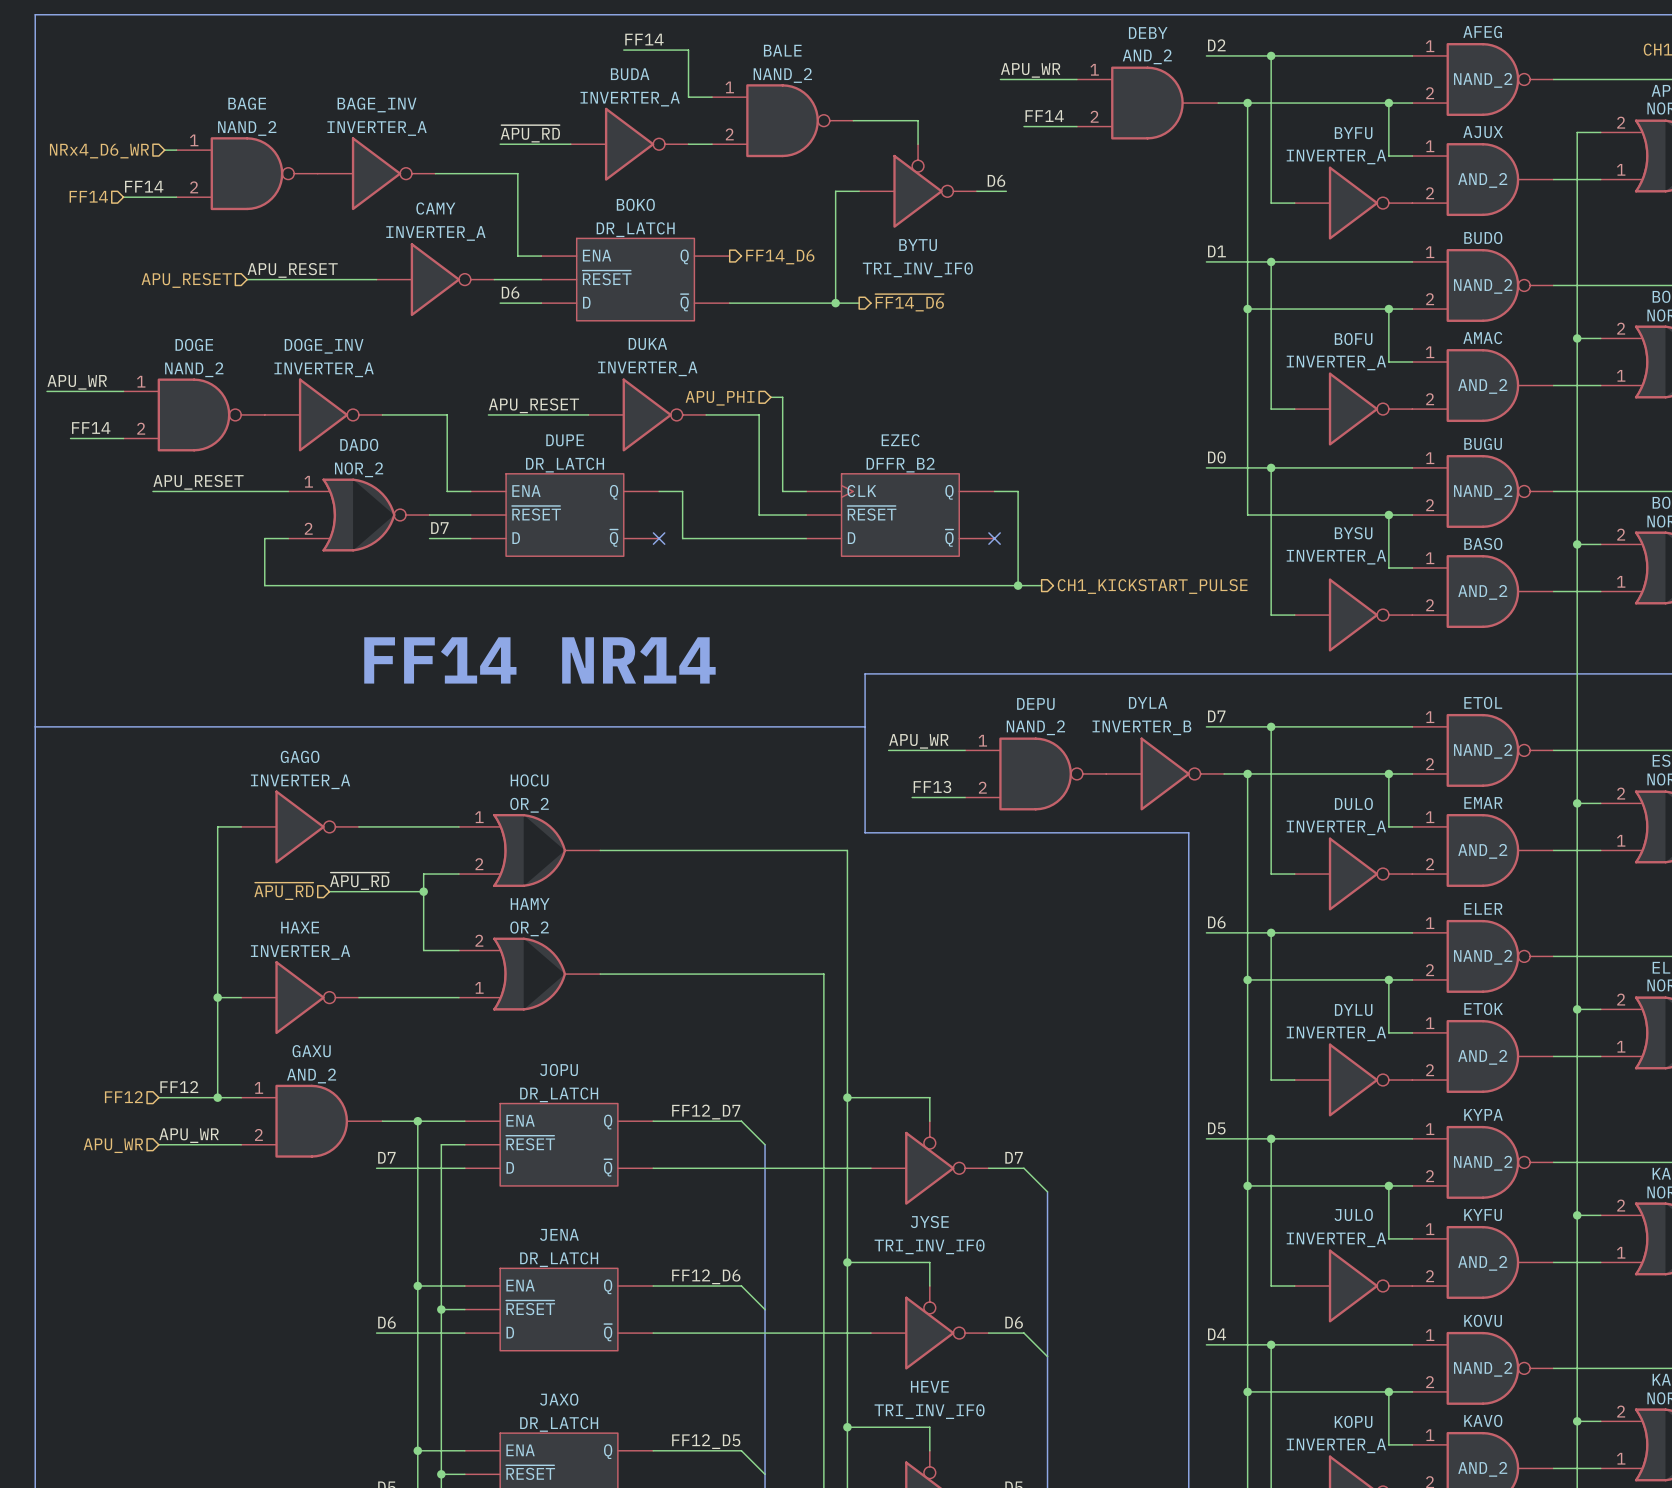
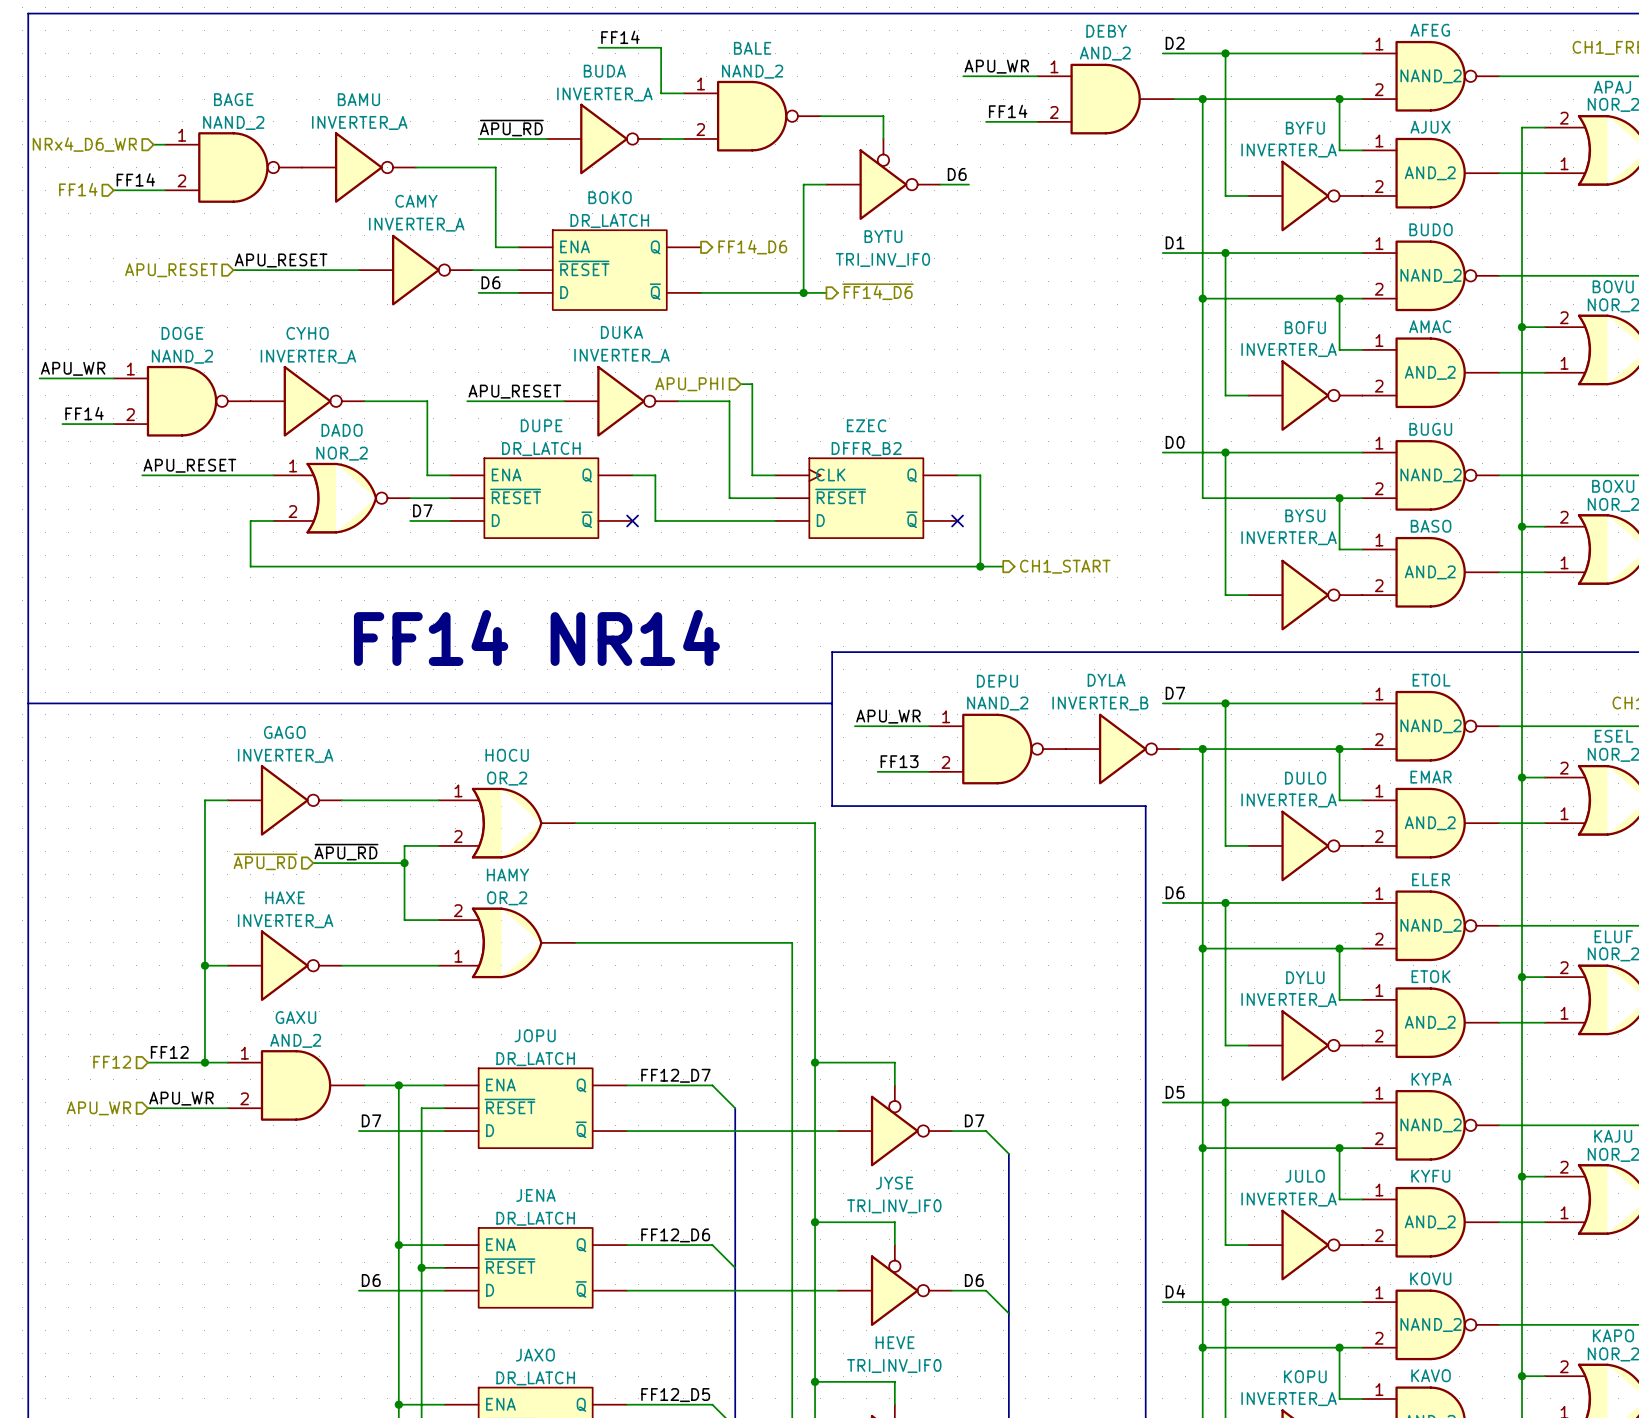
BAGE_INV name: BAGE_INV (377, 104) -> BAMU (358, 99)
DOGE_INV name: DOGE_INV (324, 346) -> CYHO (307, 333)
hierarchical label: CH1_KICKSTART_PULSE (1152, 586) -> CH1_START (1065, 566)

